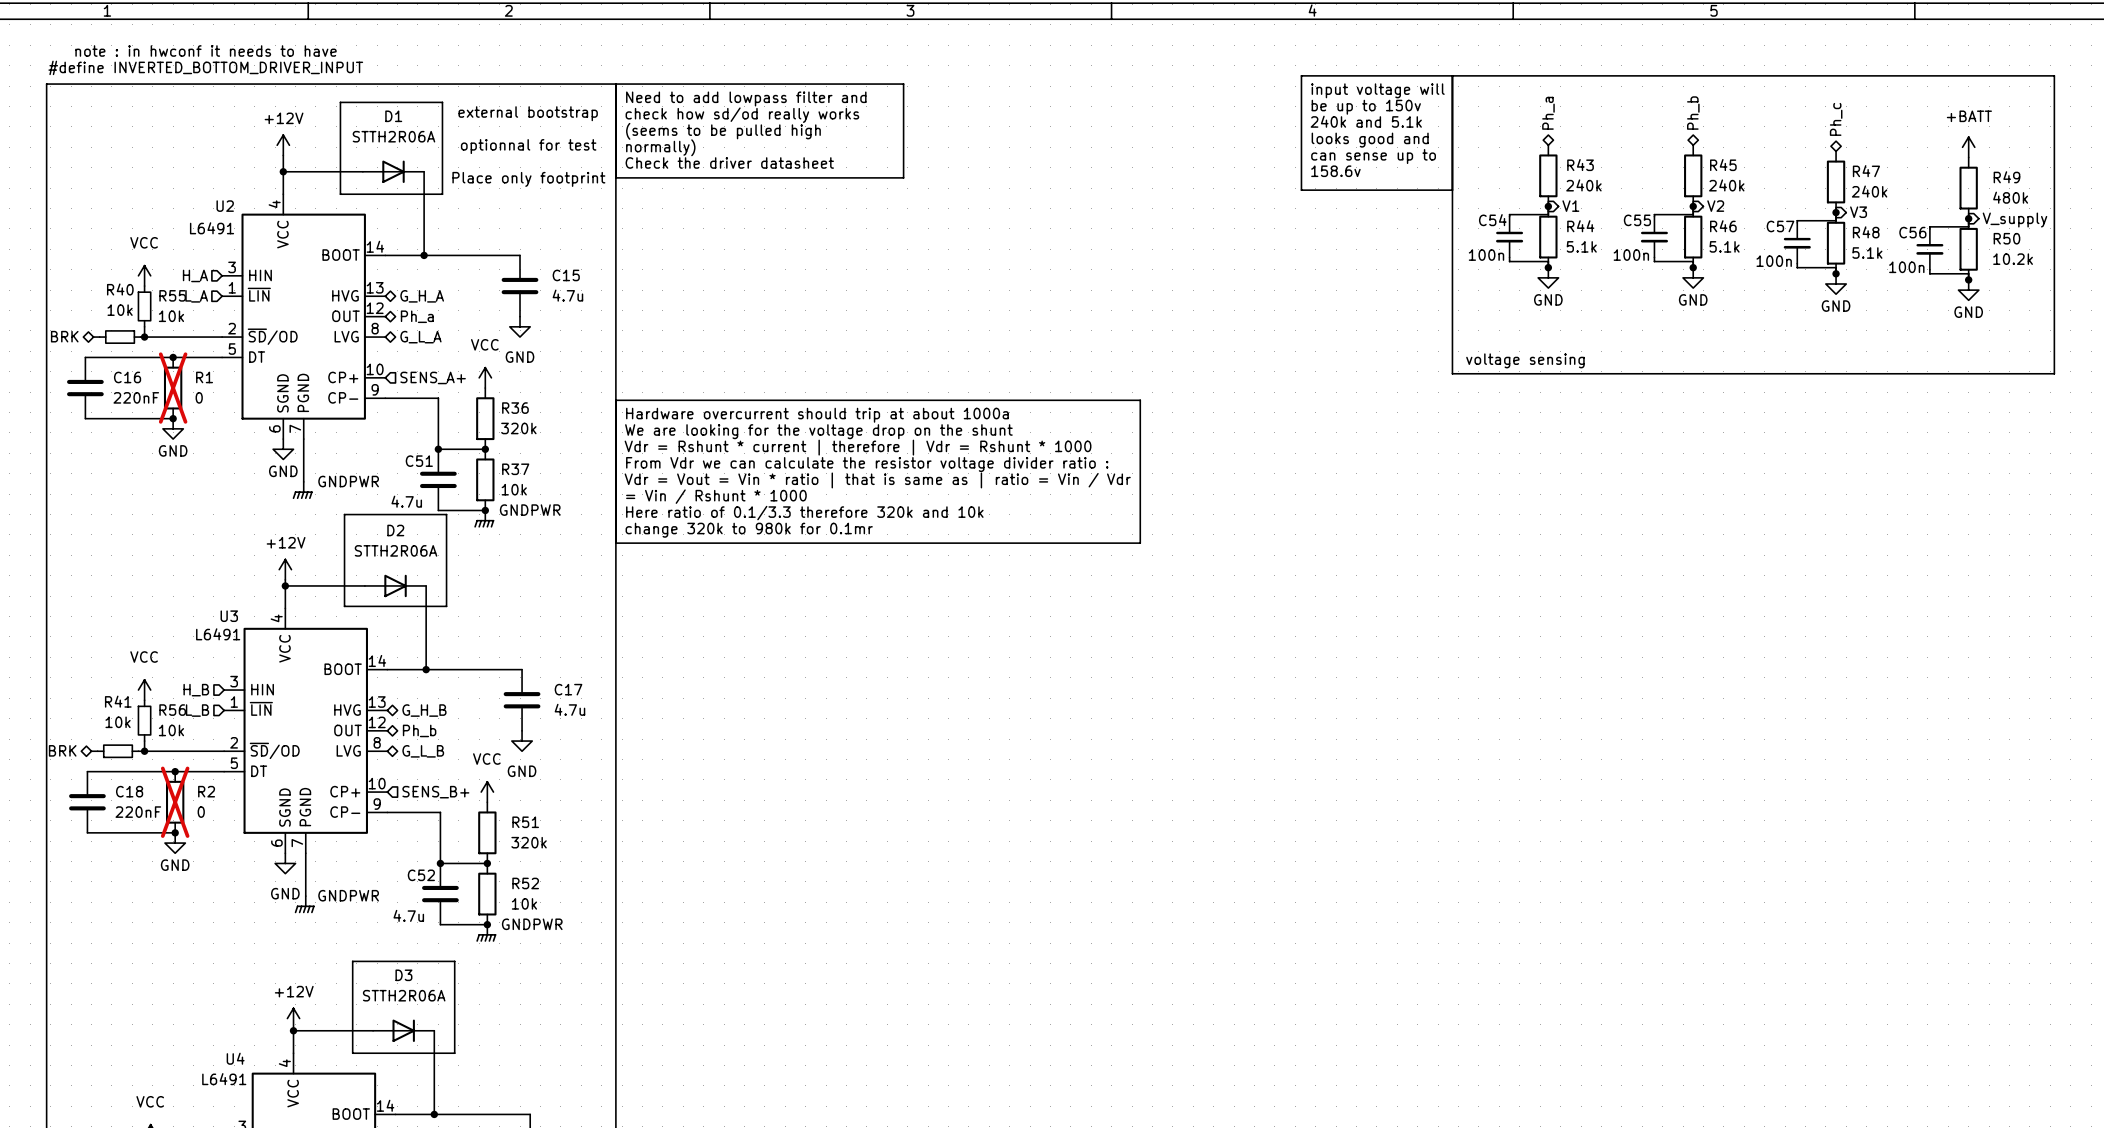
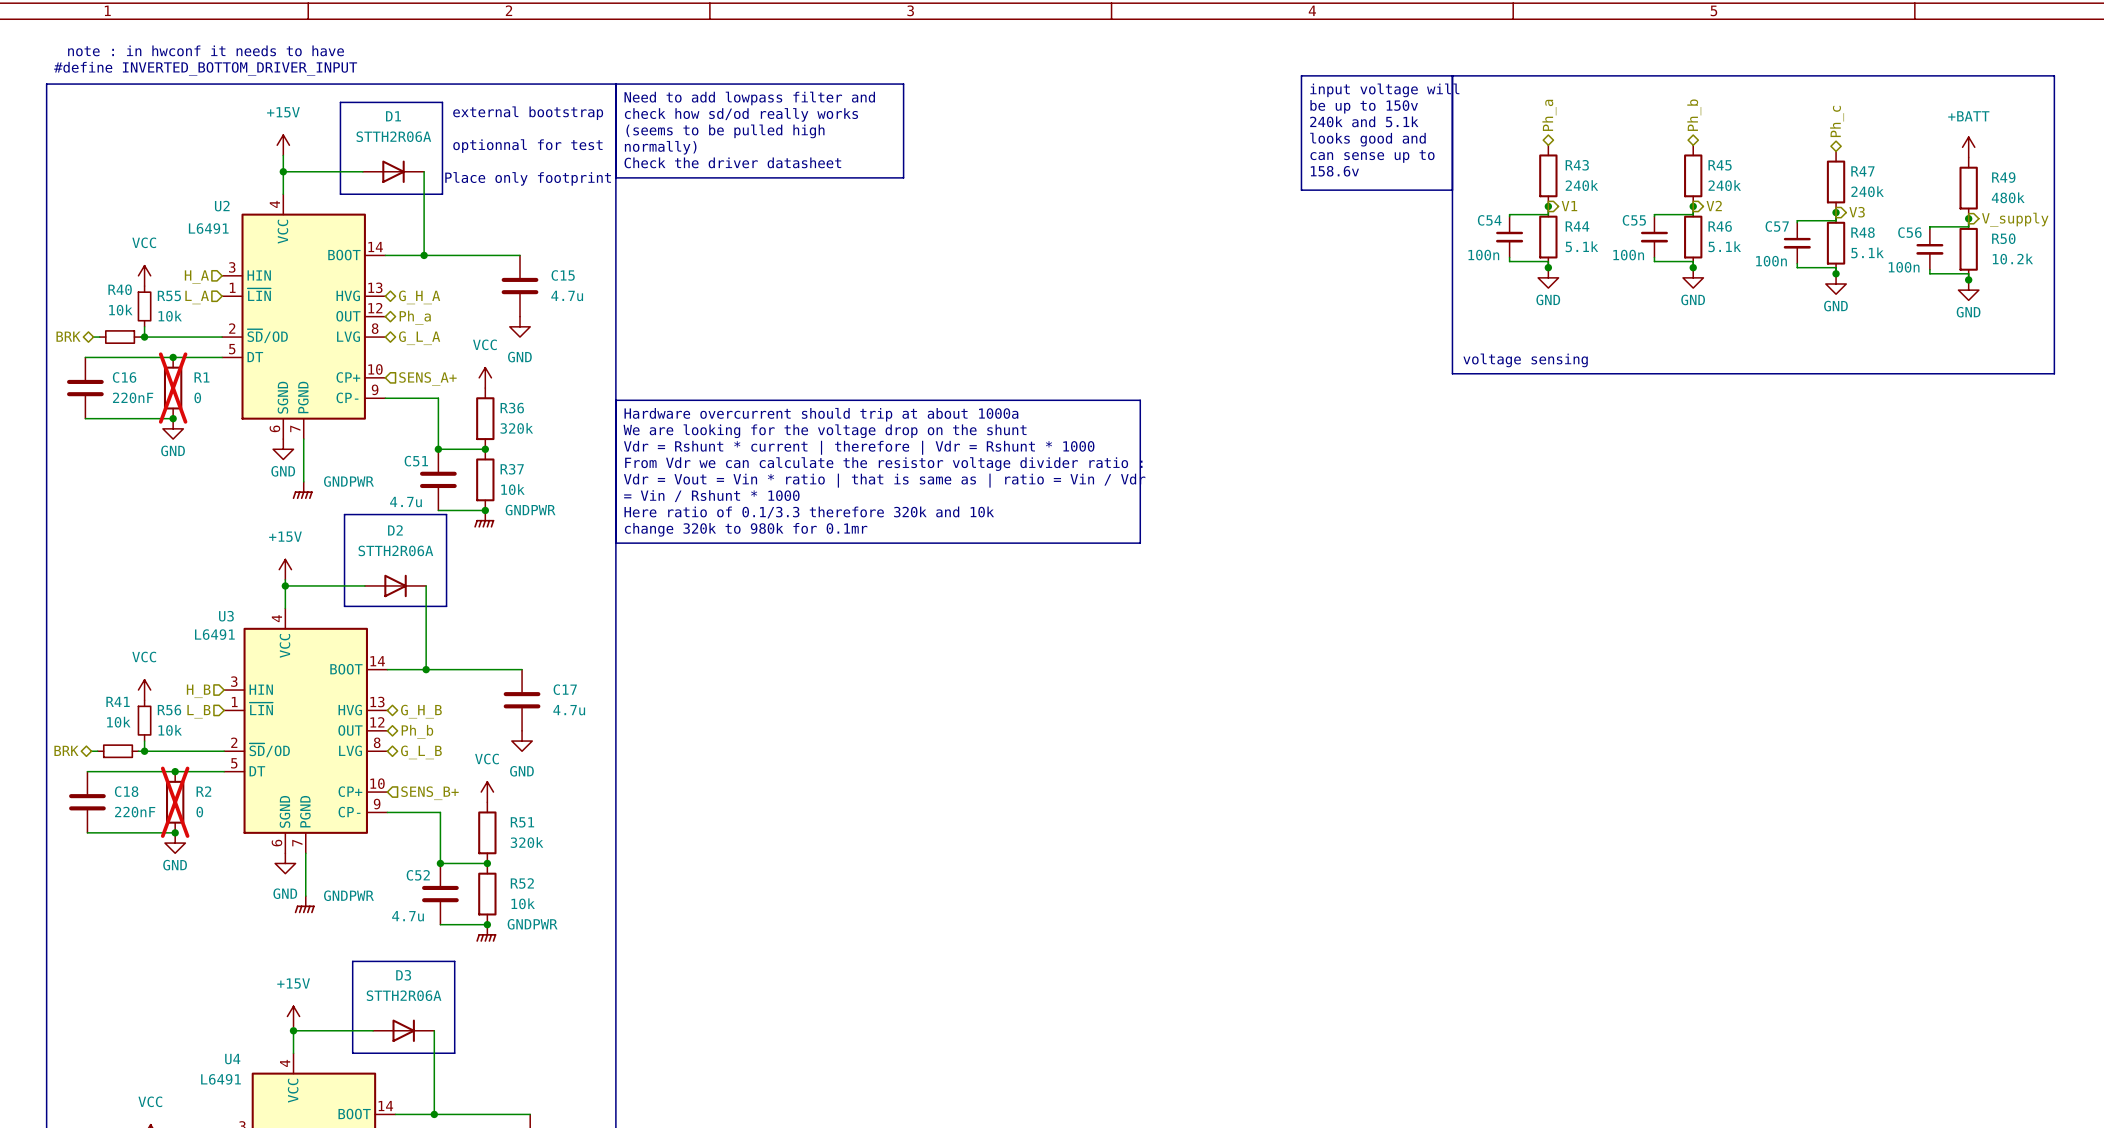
power symbol: +12V (283, 145) -> +15V (283, 145)
power symbol: +12V (285, 569) -> +15V (285, 569)
power symbol: +12V (293, 1018) -> +15V (293, 1016)

